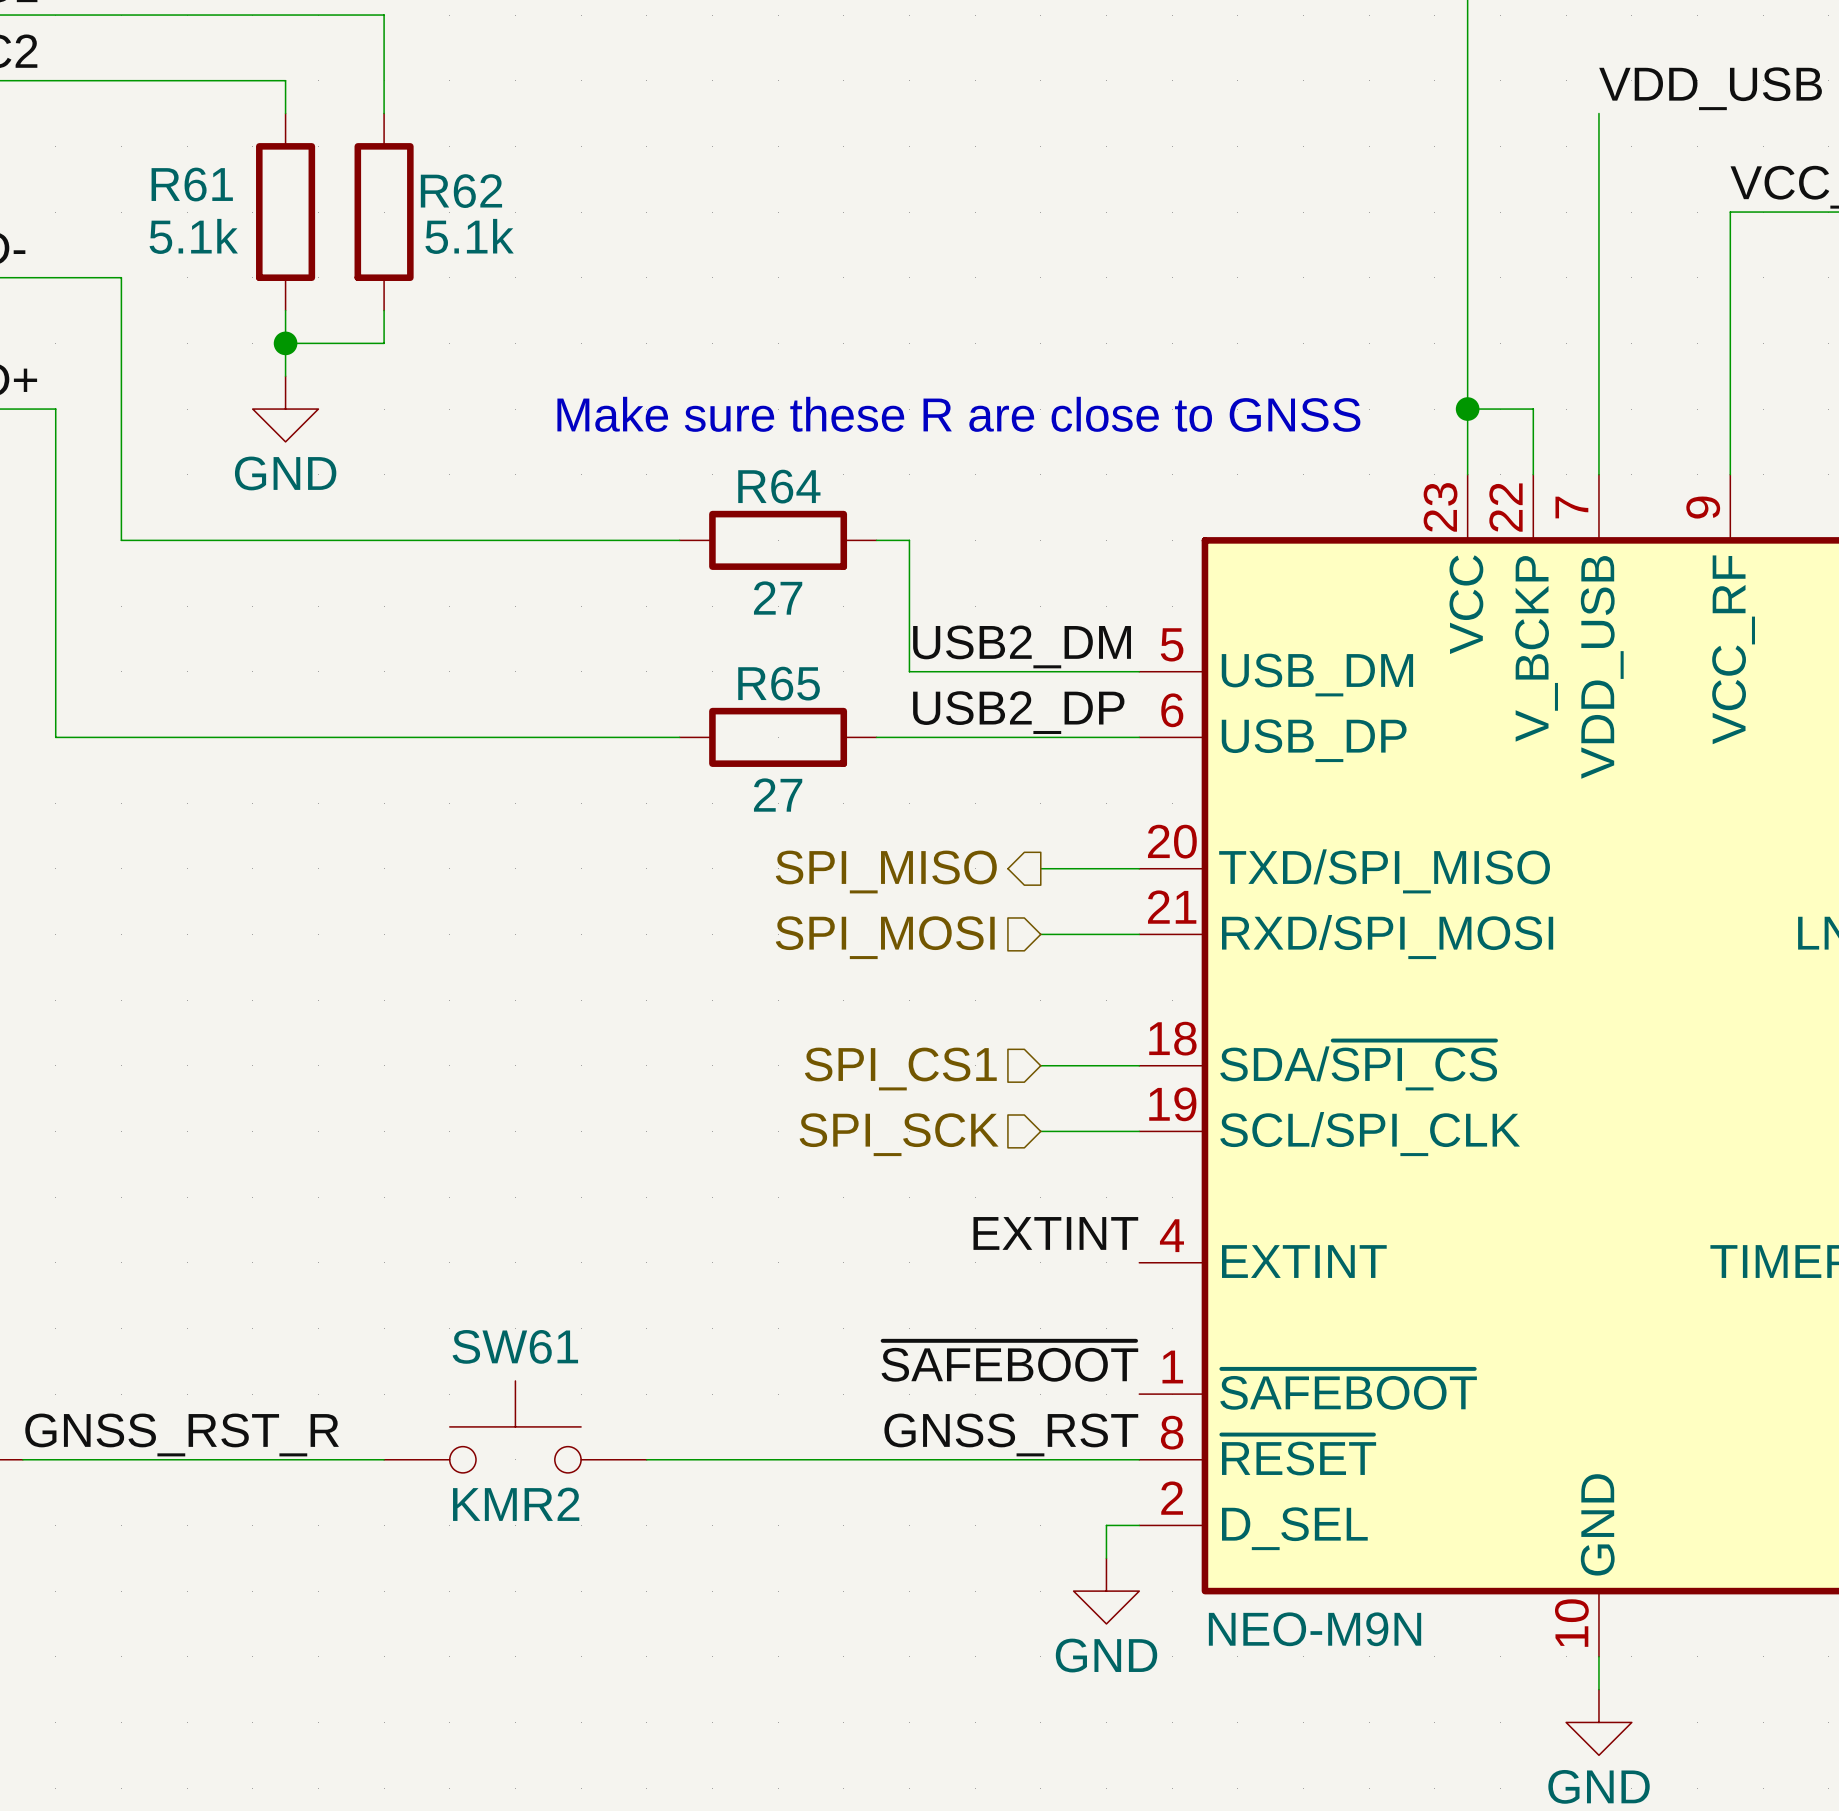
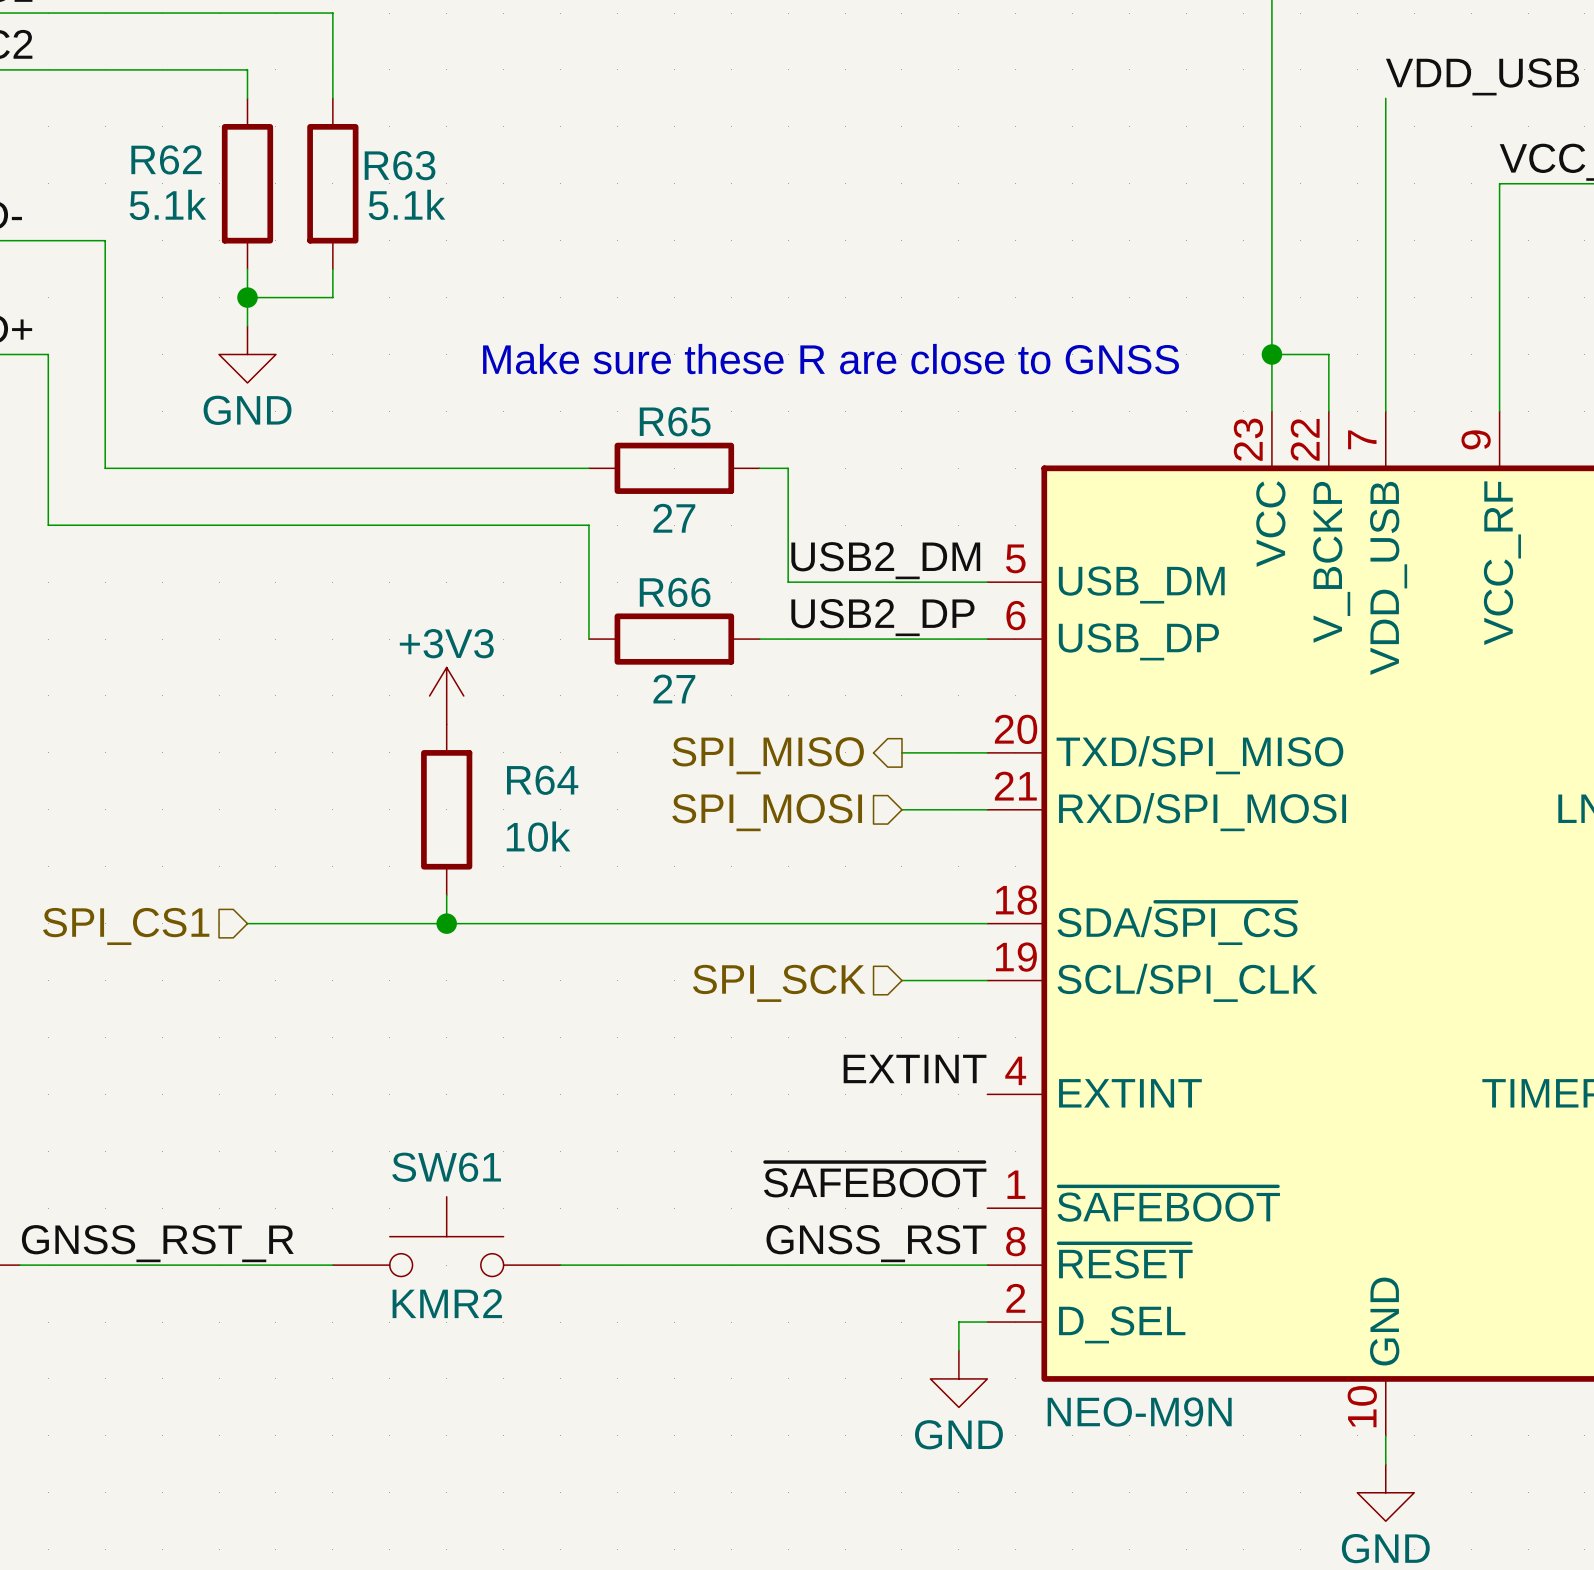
R61 name: R61 (192, 184) -> R62 (166, 159)
R62 name: R62 (461, 191) -> R63 (400, 165)
R64 name: R64 (779, 486) -> R65 (675, 421)
wire: (55, 606) (55, 737) (679, 737) -> (48, 525) (588, 525) (588, 639)
R65 name: R65 (779, 683) -> R66 (675, 592)
power symbol: none -> +3V3 (446, 695)
R64: none -> 10k (446, 809)
wire: none -> (446, 895) (446, 923)
wire: none -> (247, 923) (901, 923)
junction: none -> (446, 923)
hierarchical label: none -> SPI_CS1 (126, 926)
hierarchical label: SPI_CS1 (900, 1069) -> none

